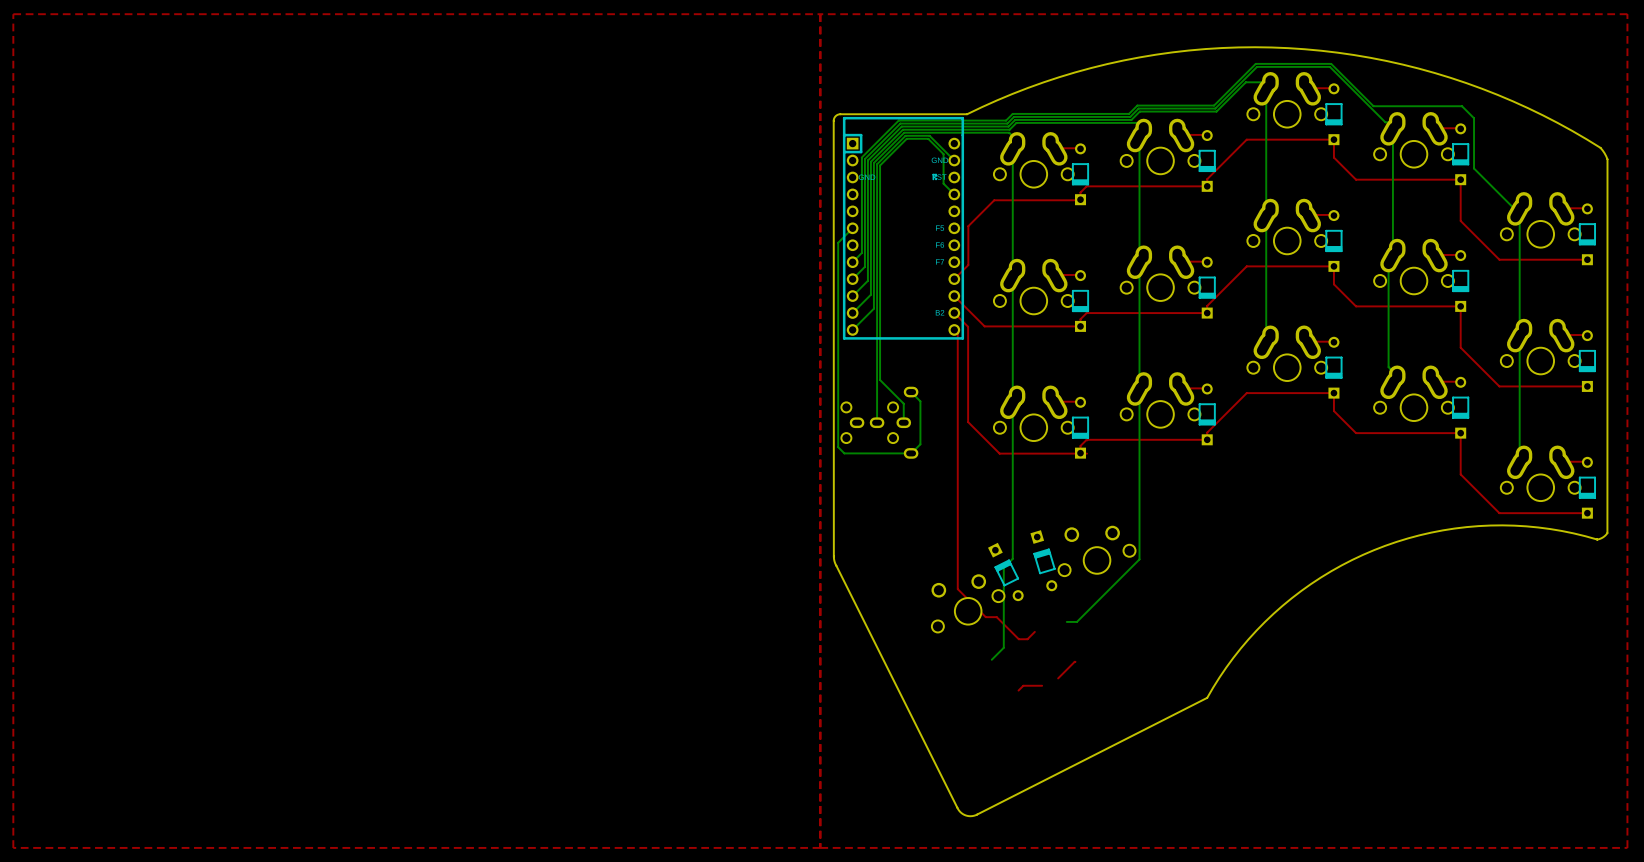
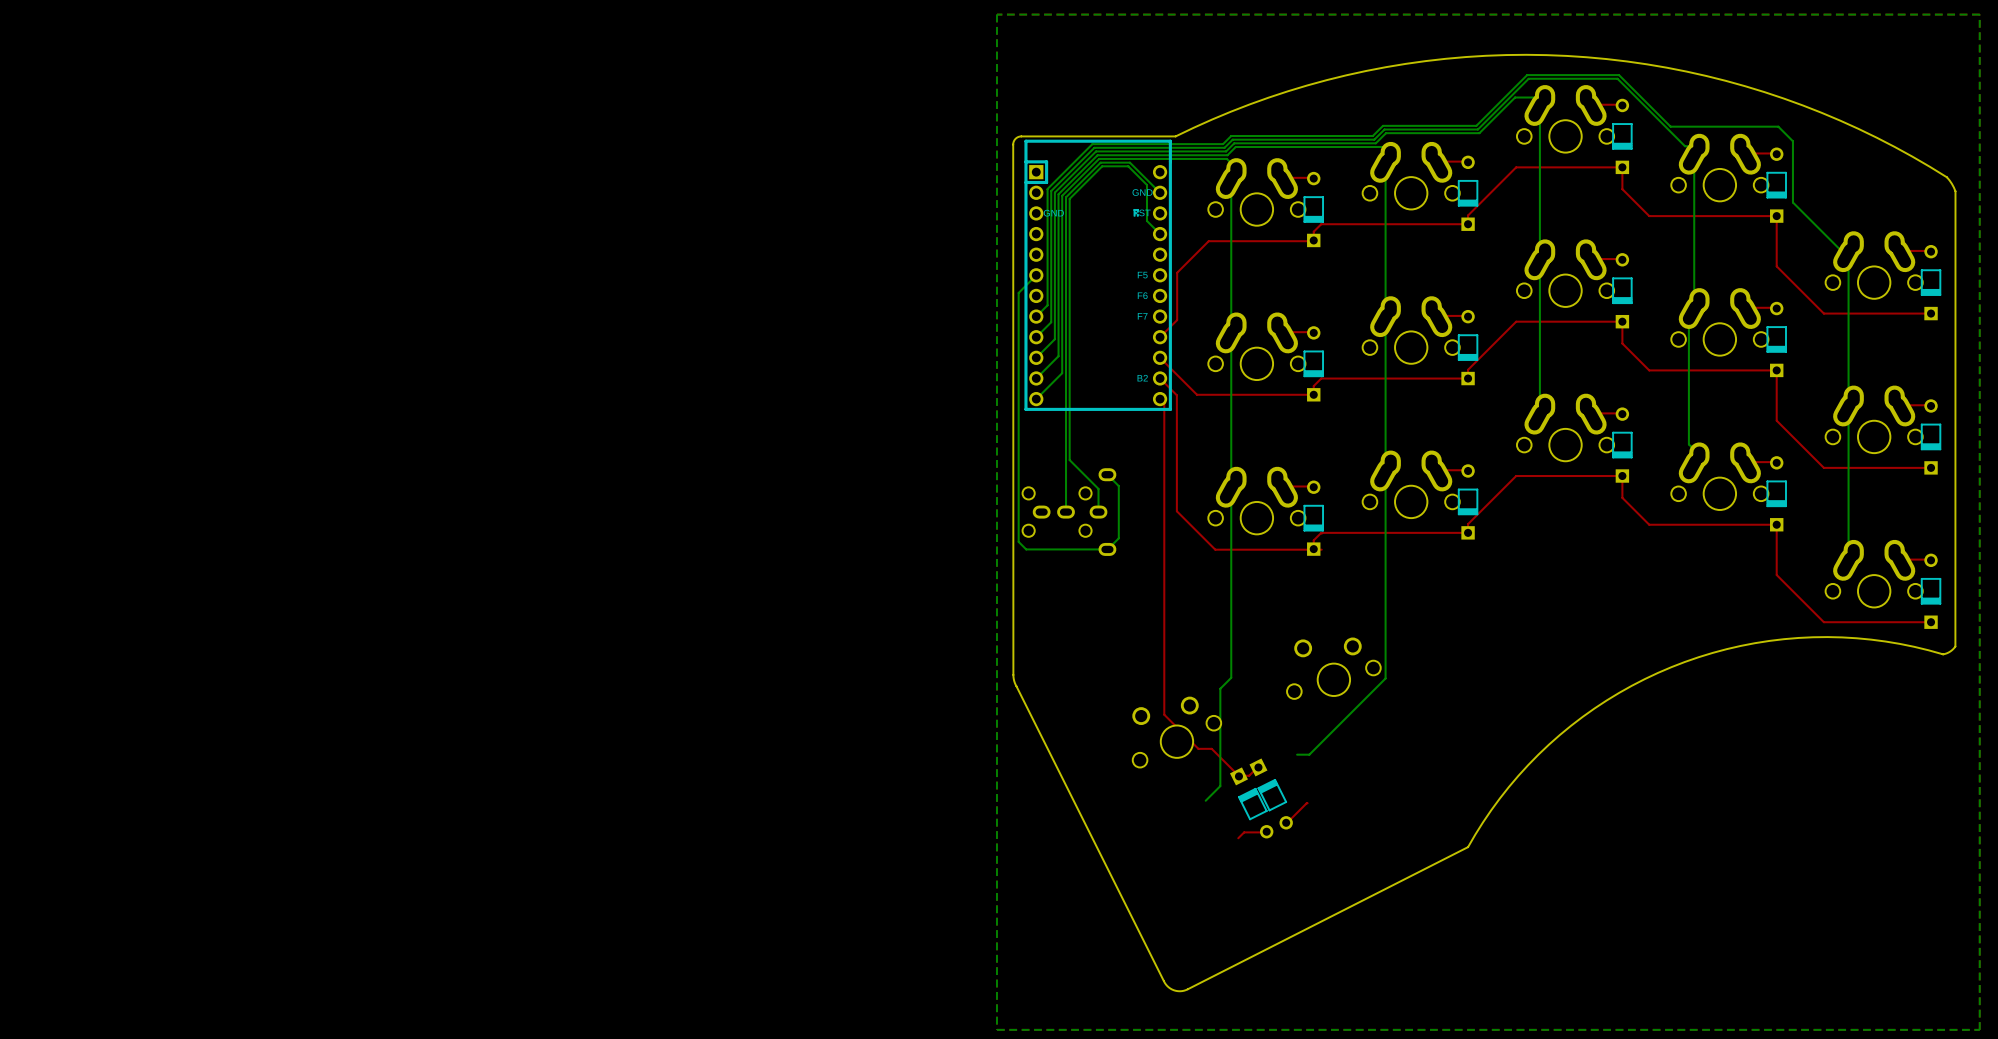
top zone outline: (820, 14) (13, 14) (13, 847) (820, 847) -> none
bottom zone outline: none -> (1979, 14) (1979, 1029) (996, 1029) (996, 14) (1979, 14)
part: (1043, 560) -> none
part: (1005, 571) -> none
part: none -> (1271, 793)
part: none -> (1251, 802)

